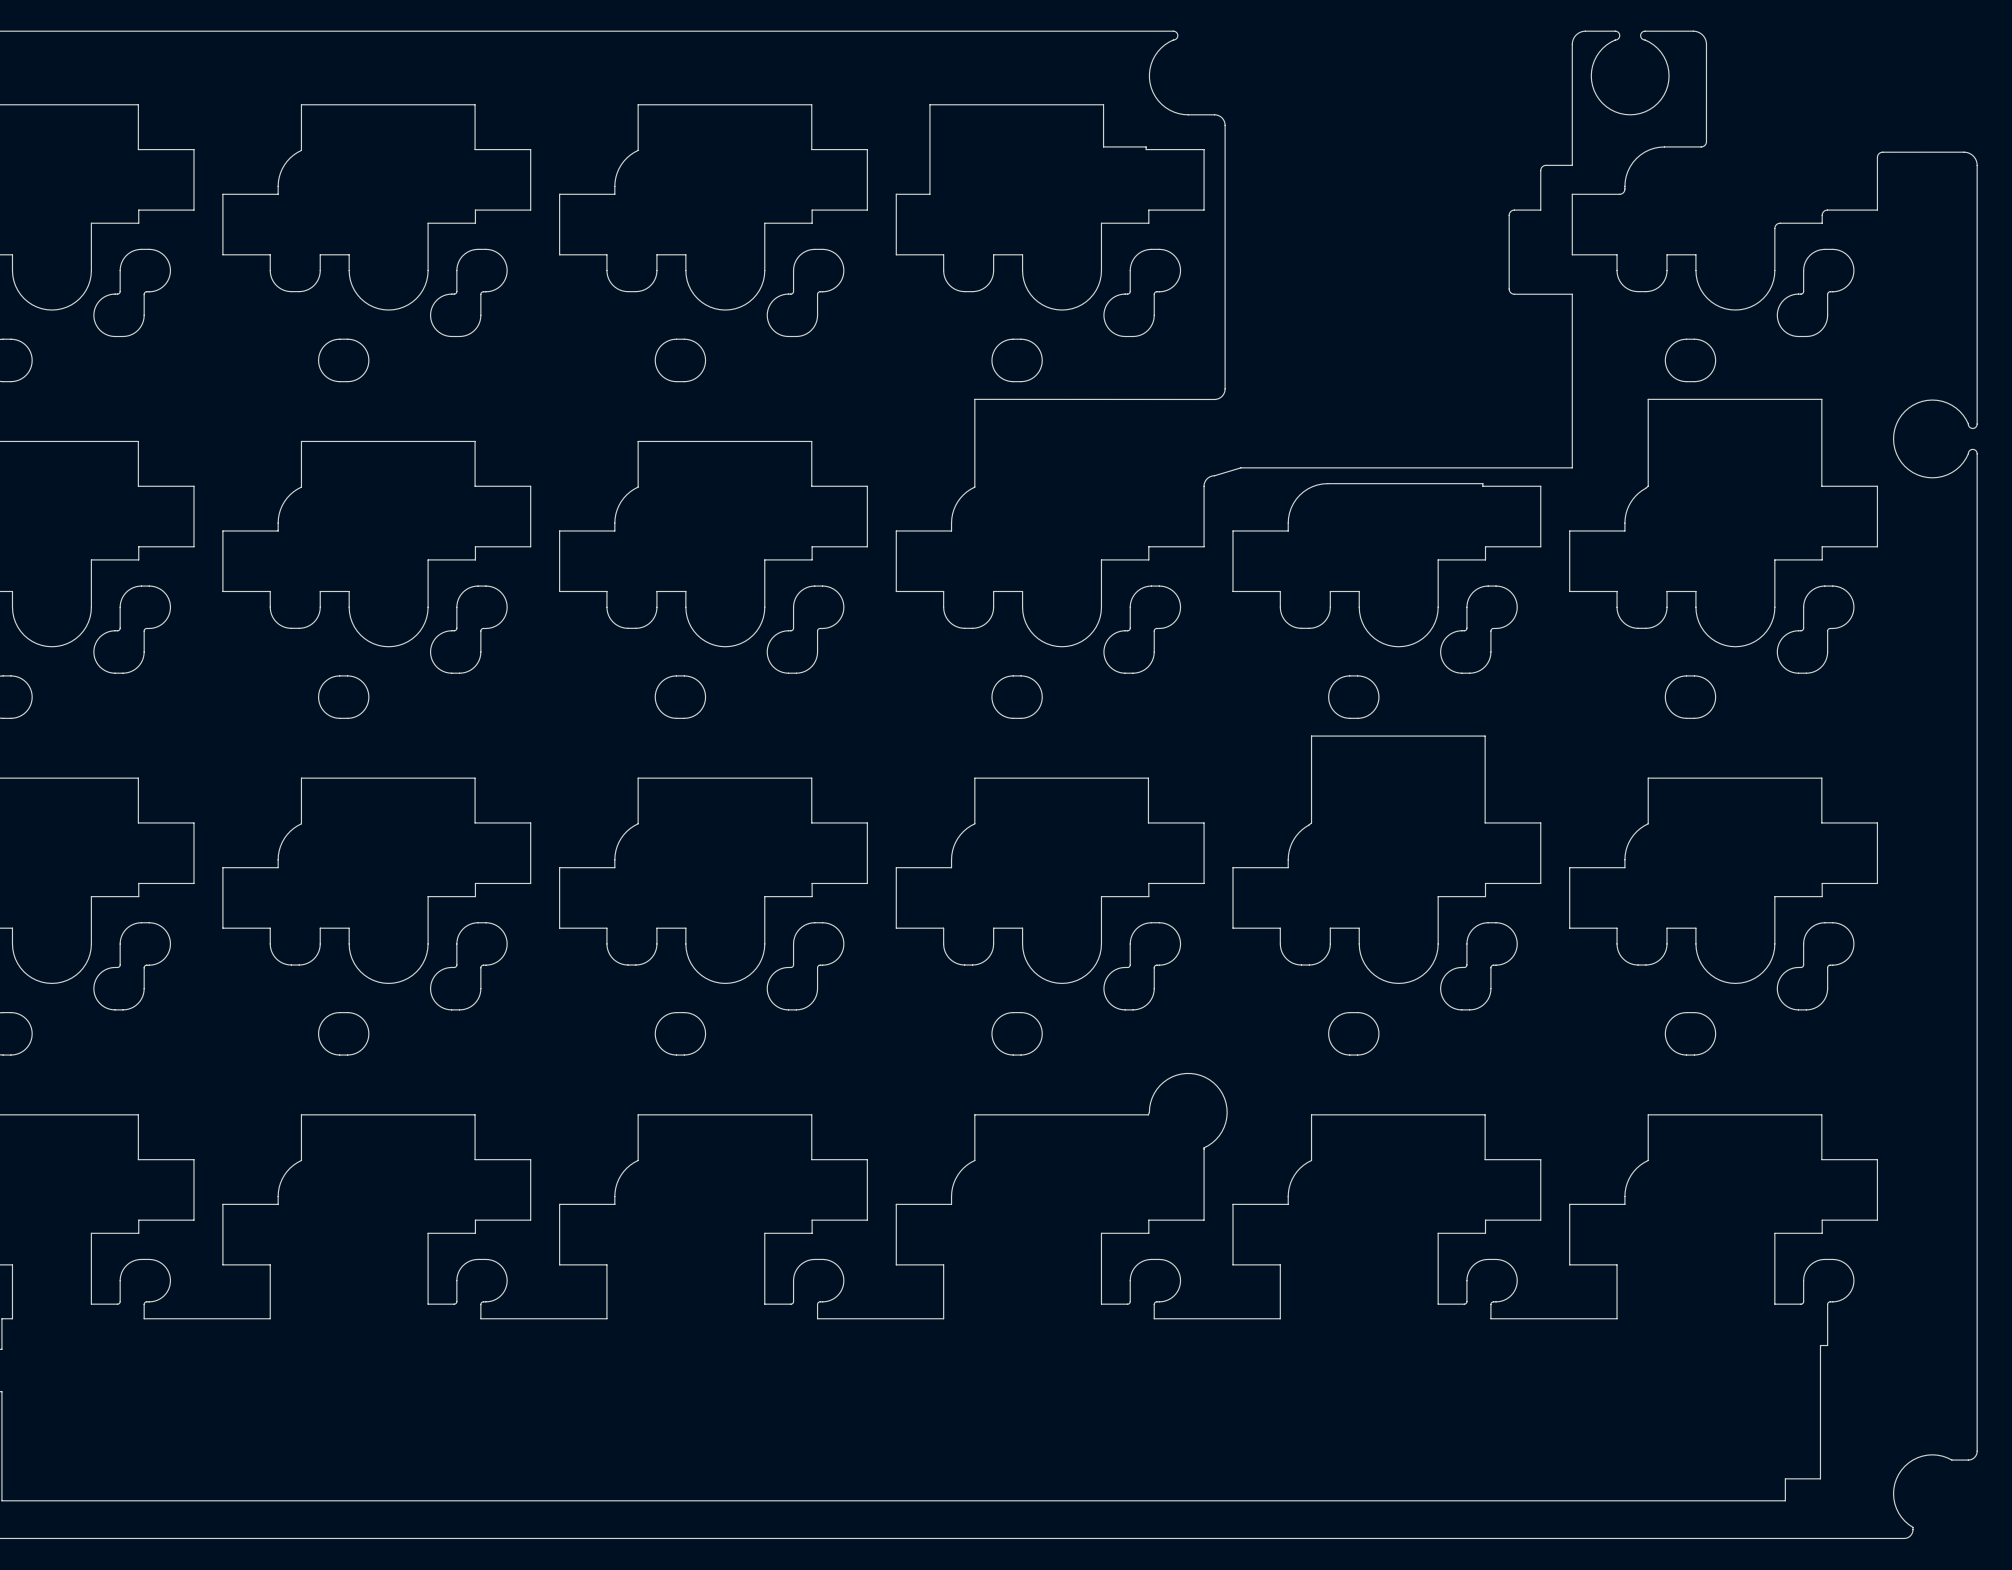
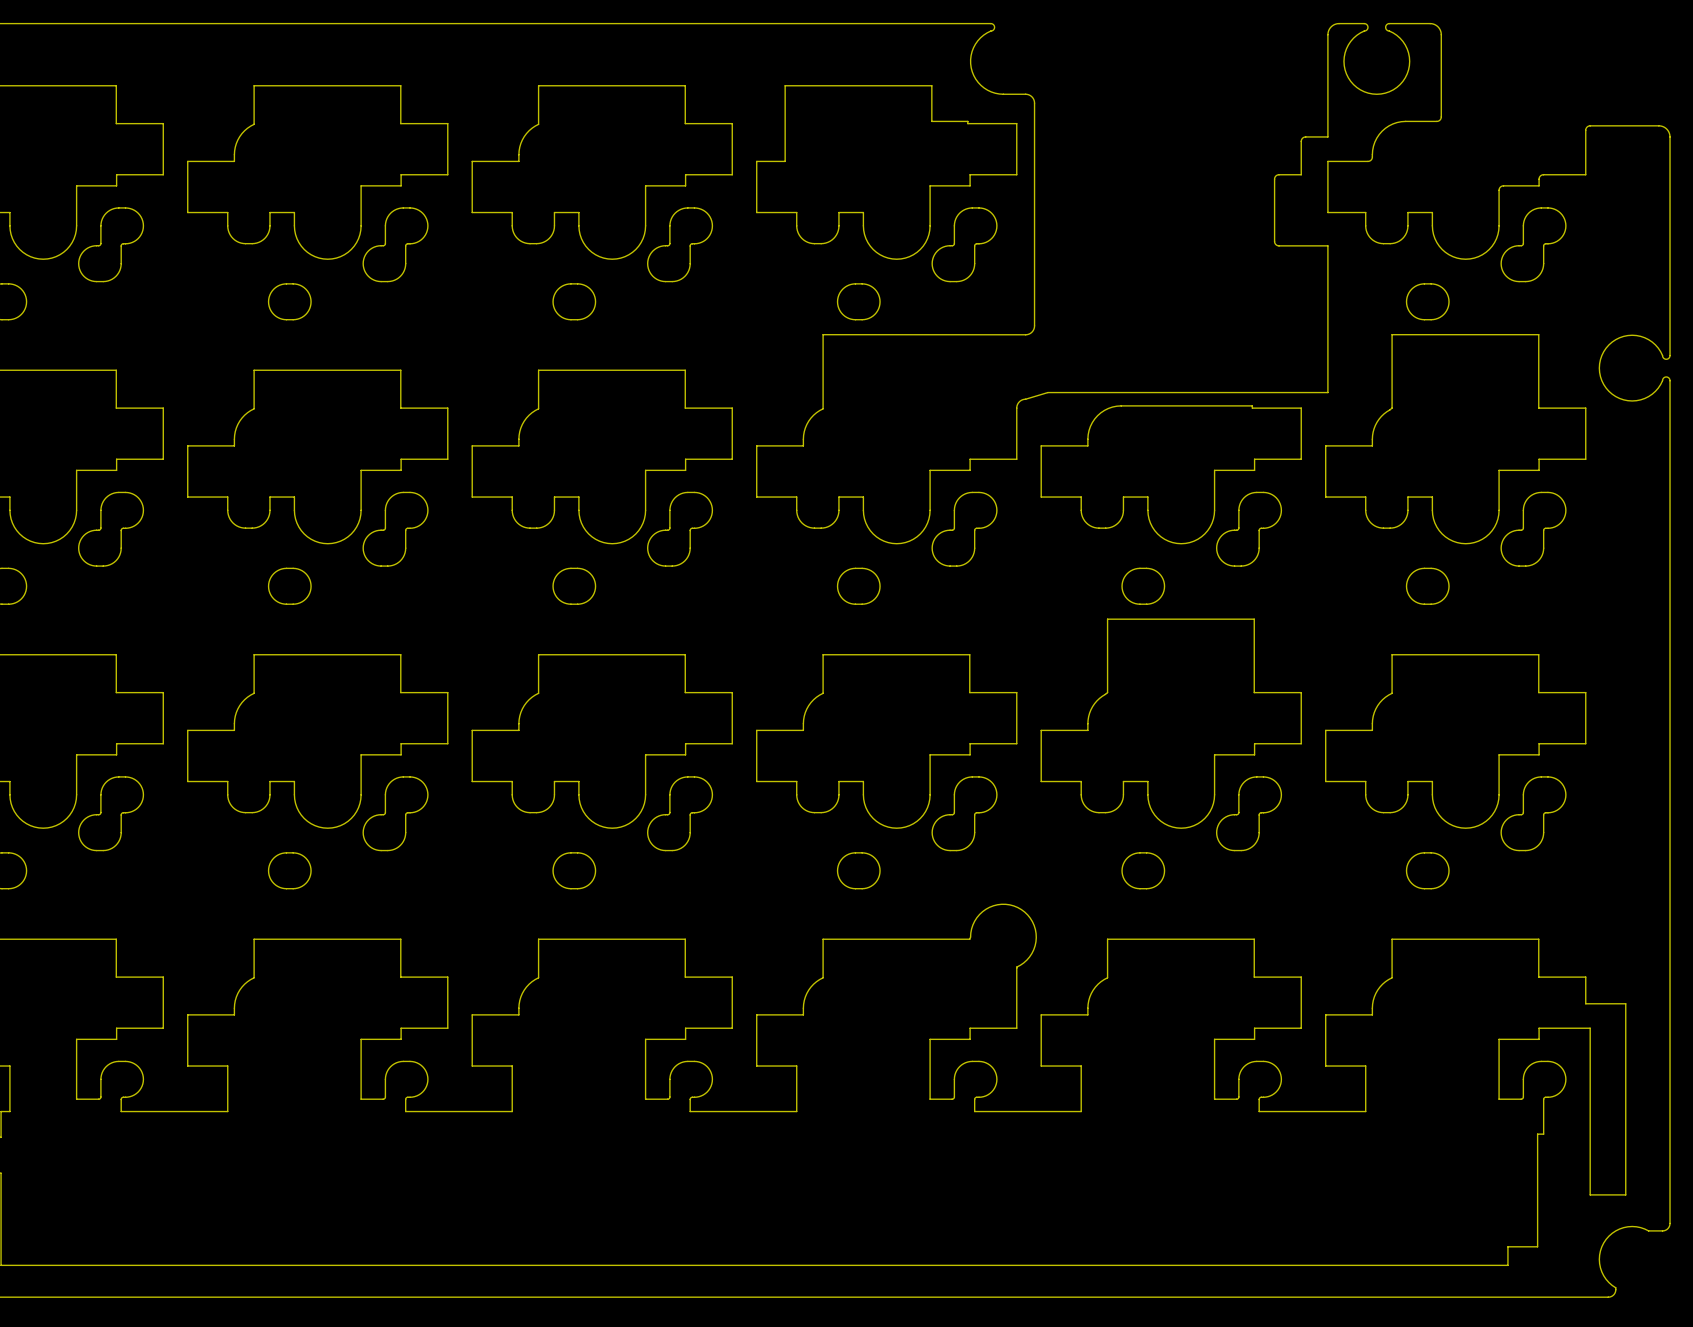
board edge: (1877, 1191) (1877, 1220) -> (1585, 1003) (1625, 1003) (1625, 1194) (1590, 1194) (1590, 1028) (1585, 1028)

